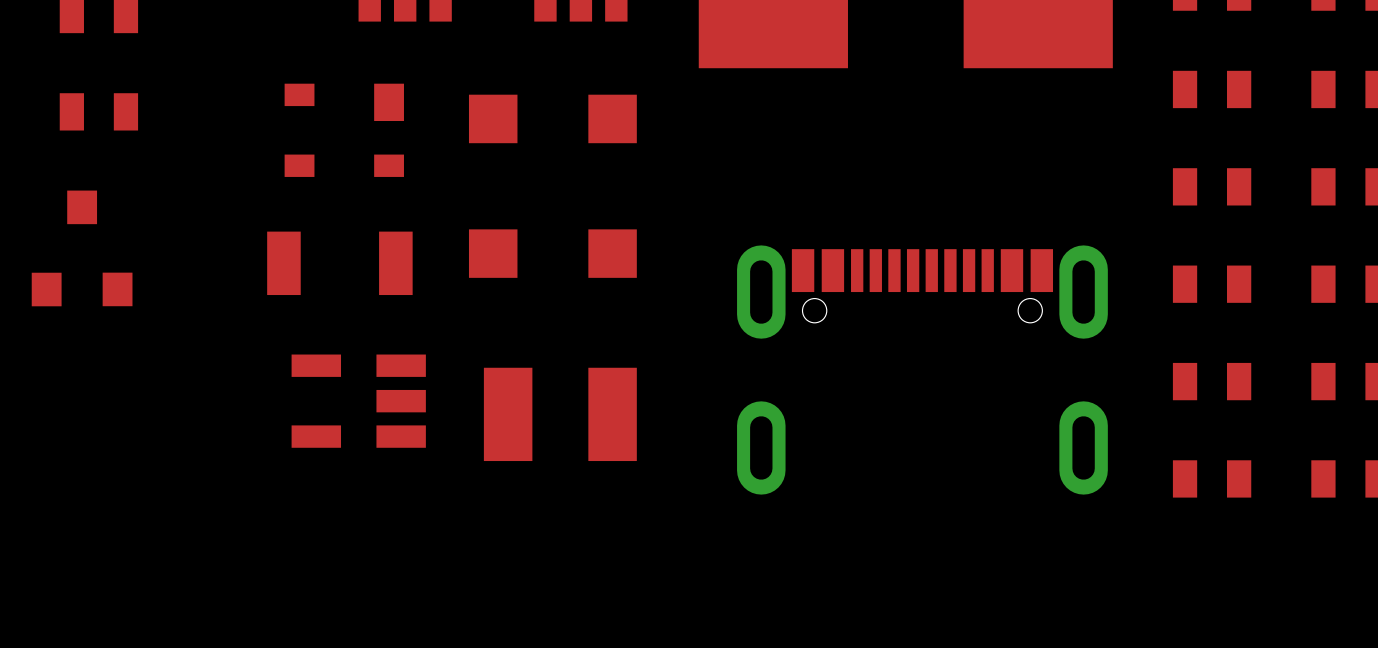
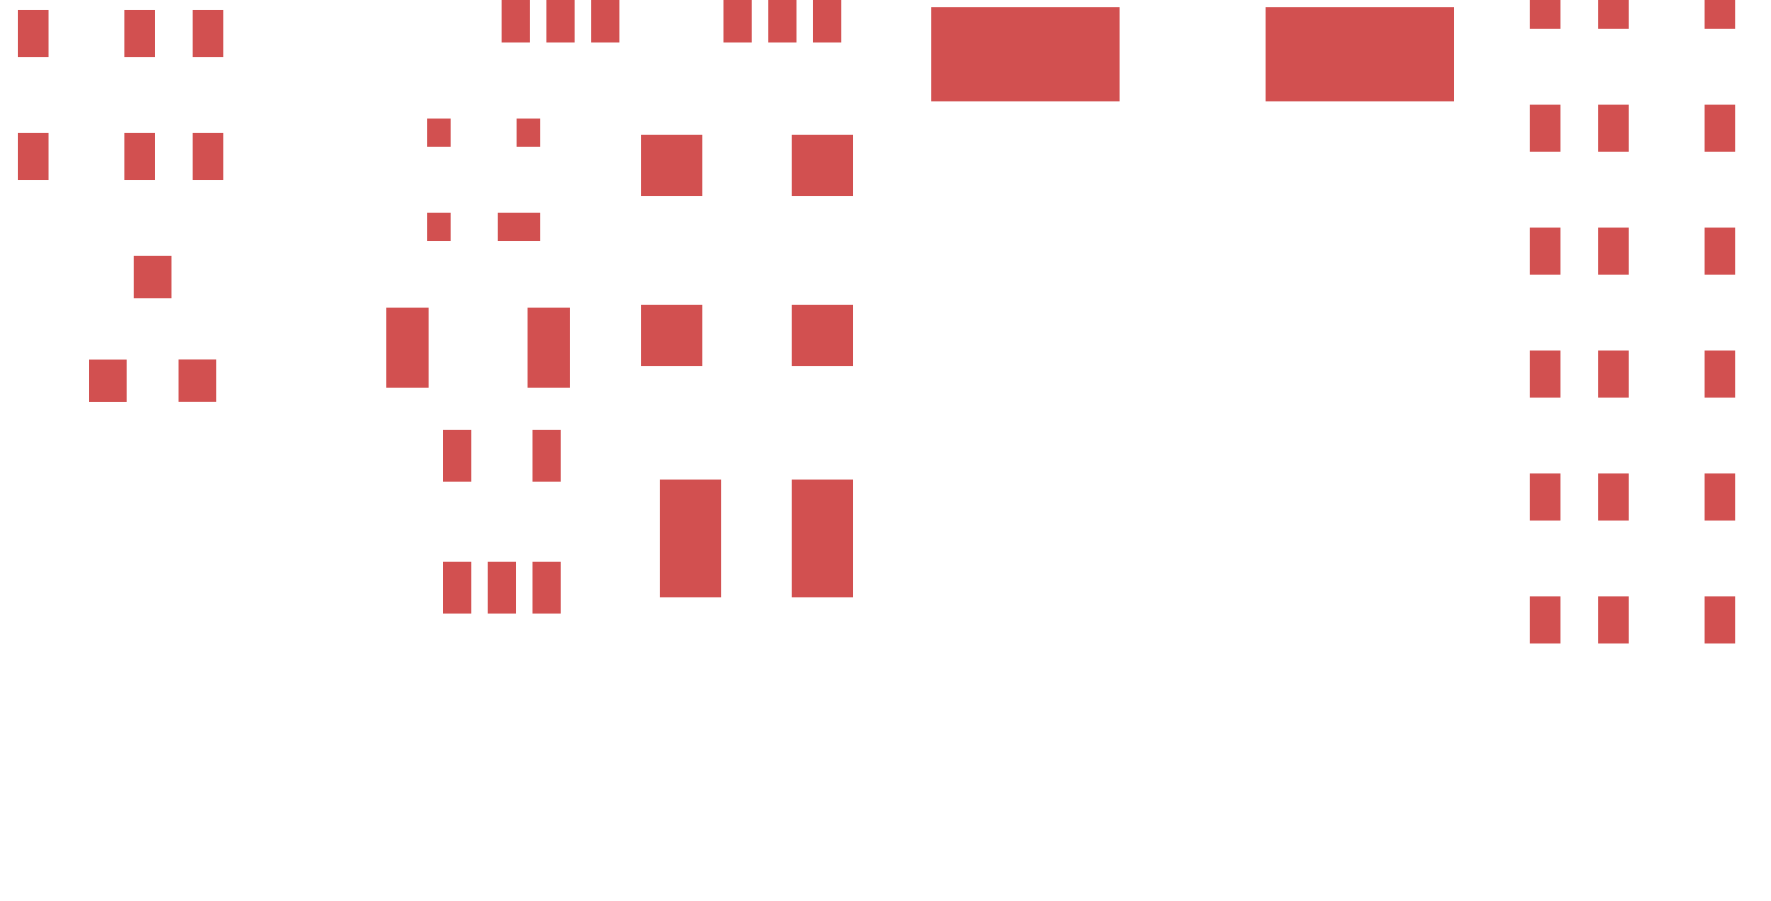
part footprint: [284, 83, 404, 177] -> [427, 118, 541, 242]
part footprint: [291, 354, 426, 448] -> [443, 429, 561, 614]
part: (922, 370) -> none

